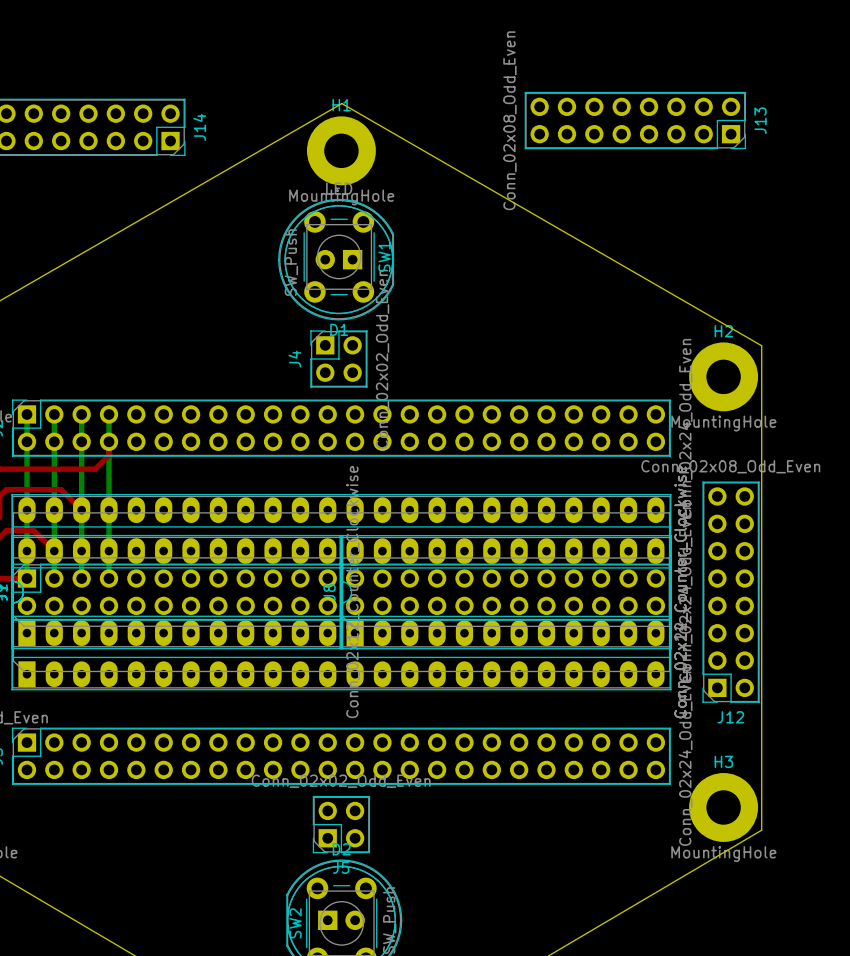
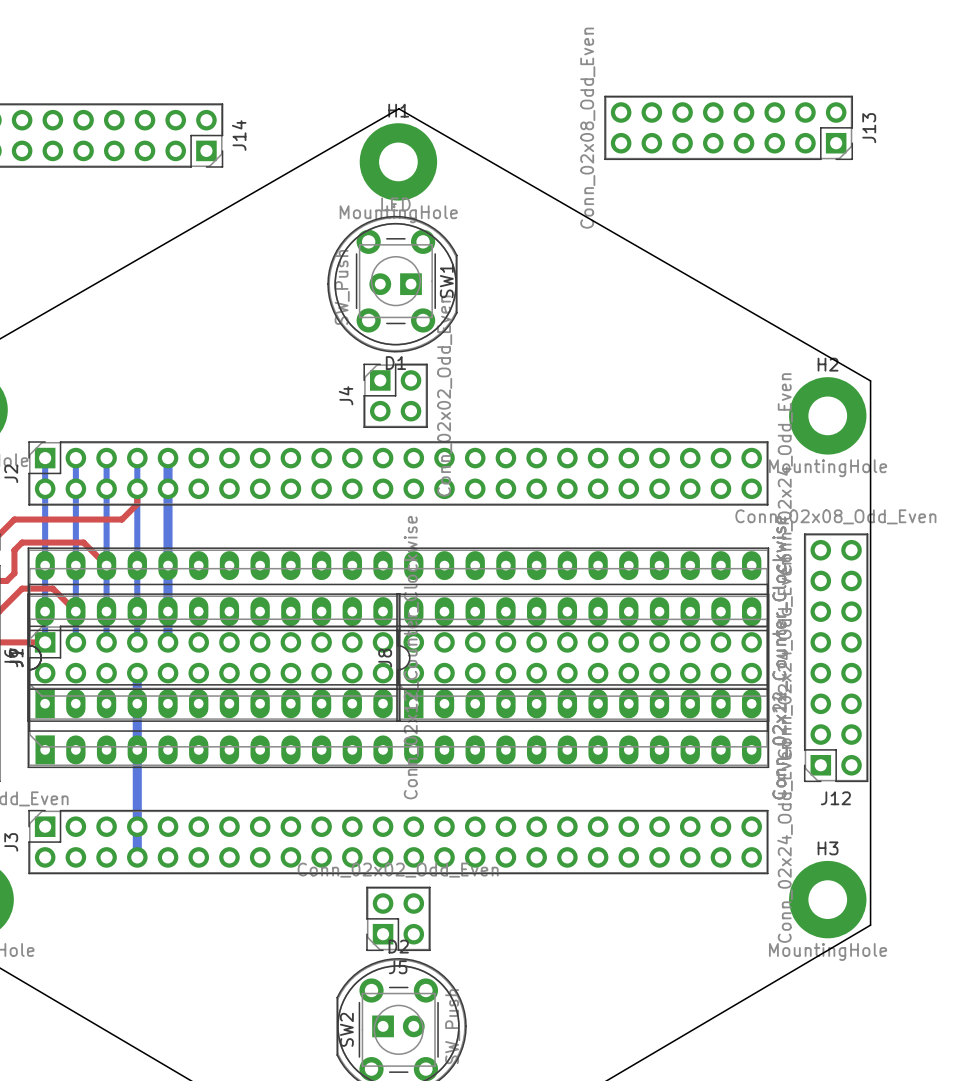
bottom track: none -> (168, 458) (167, 642)
bottom track: none -> (137, 673) (137, 857)

